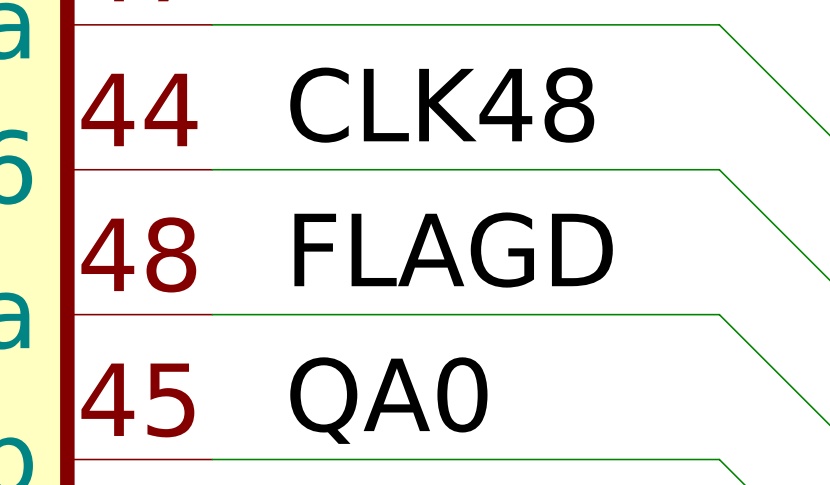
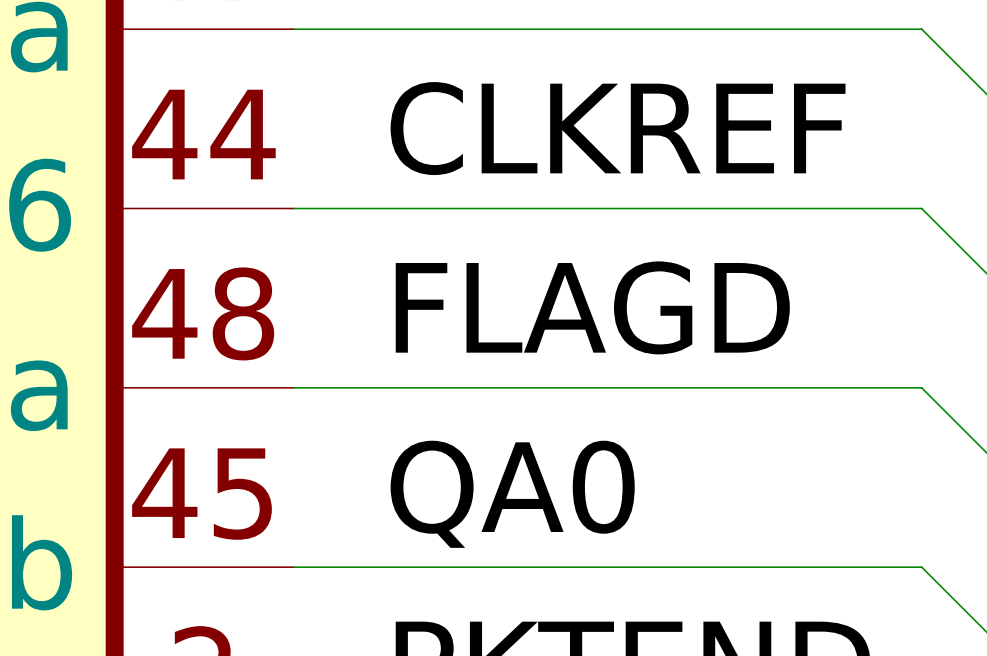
label: CLK48 (442, 105) -> CLKREF (618, 128)

